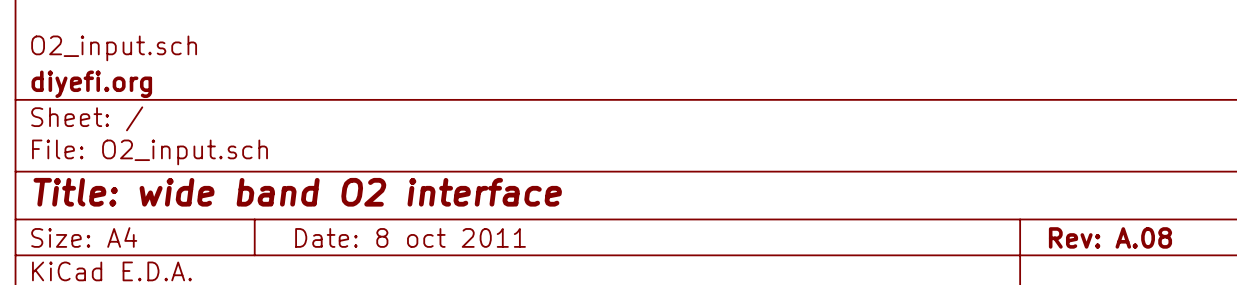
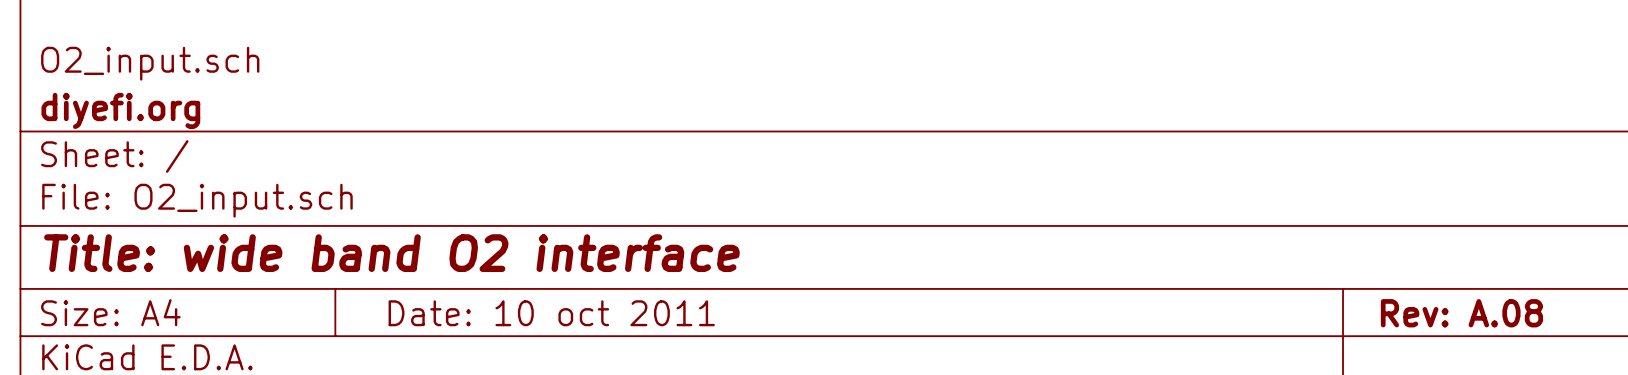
title block: Date: 8 oct 2011 (410, 237) -> Date: 10 oct 2011 (551, 313)

